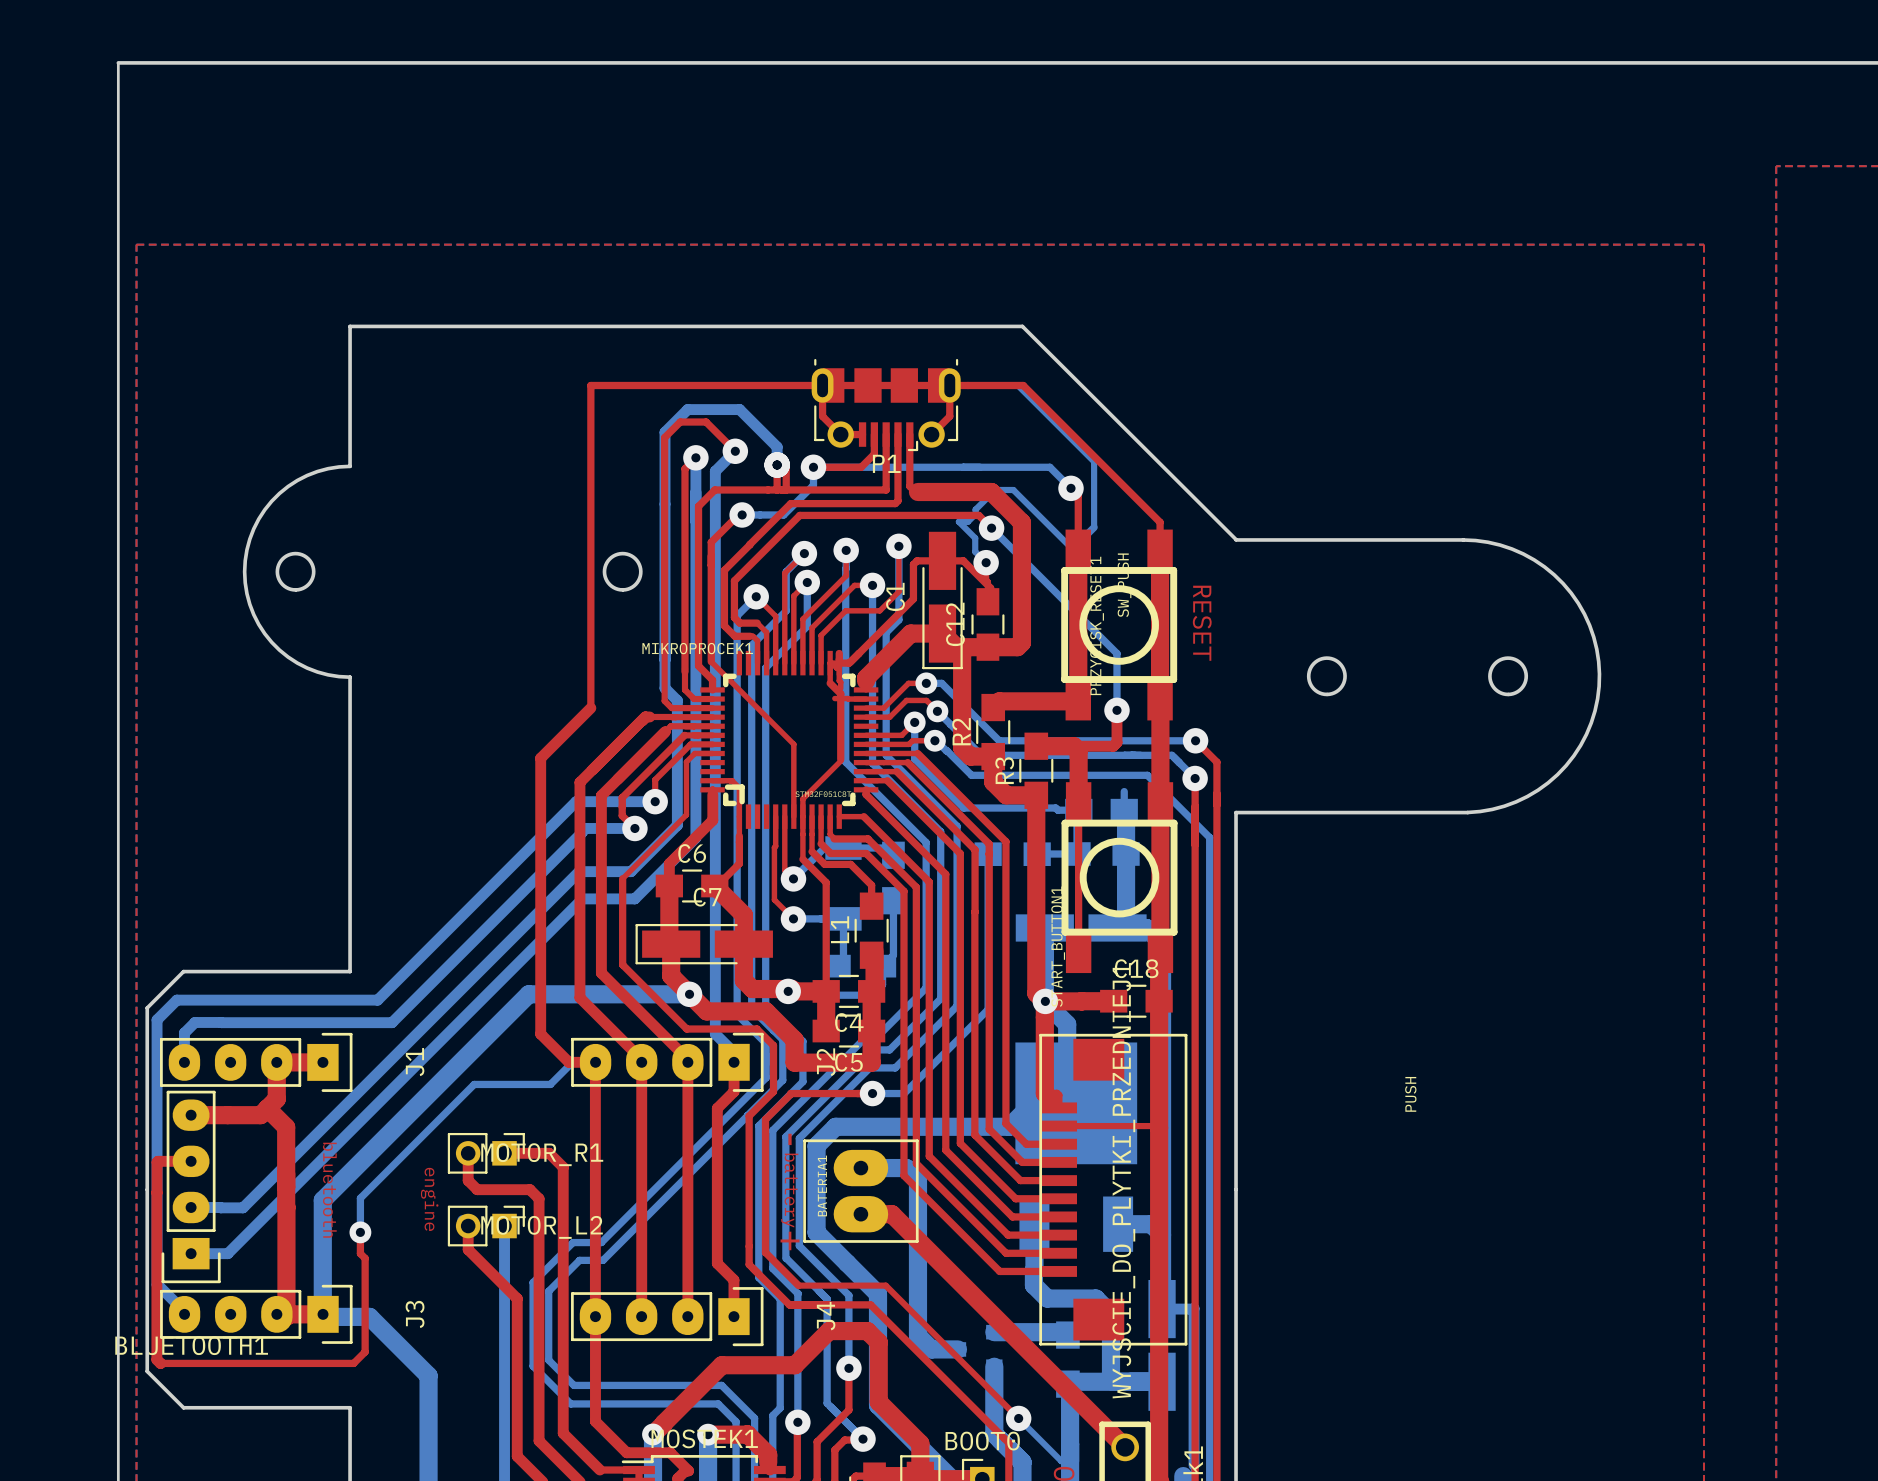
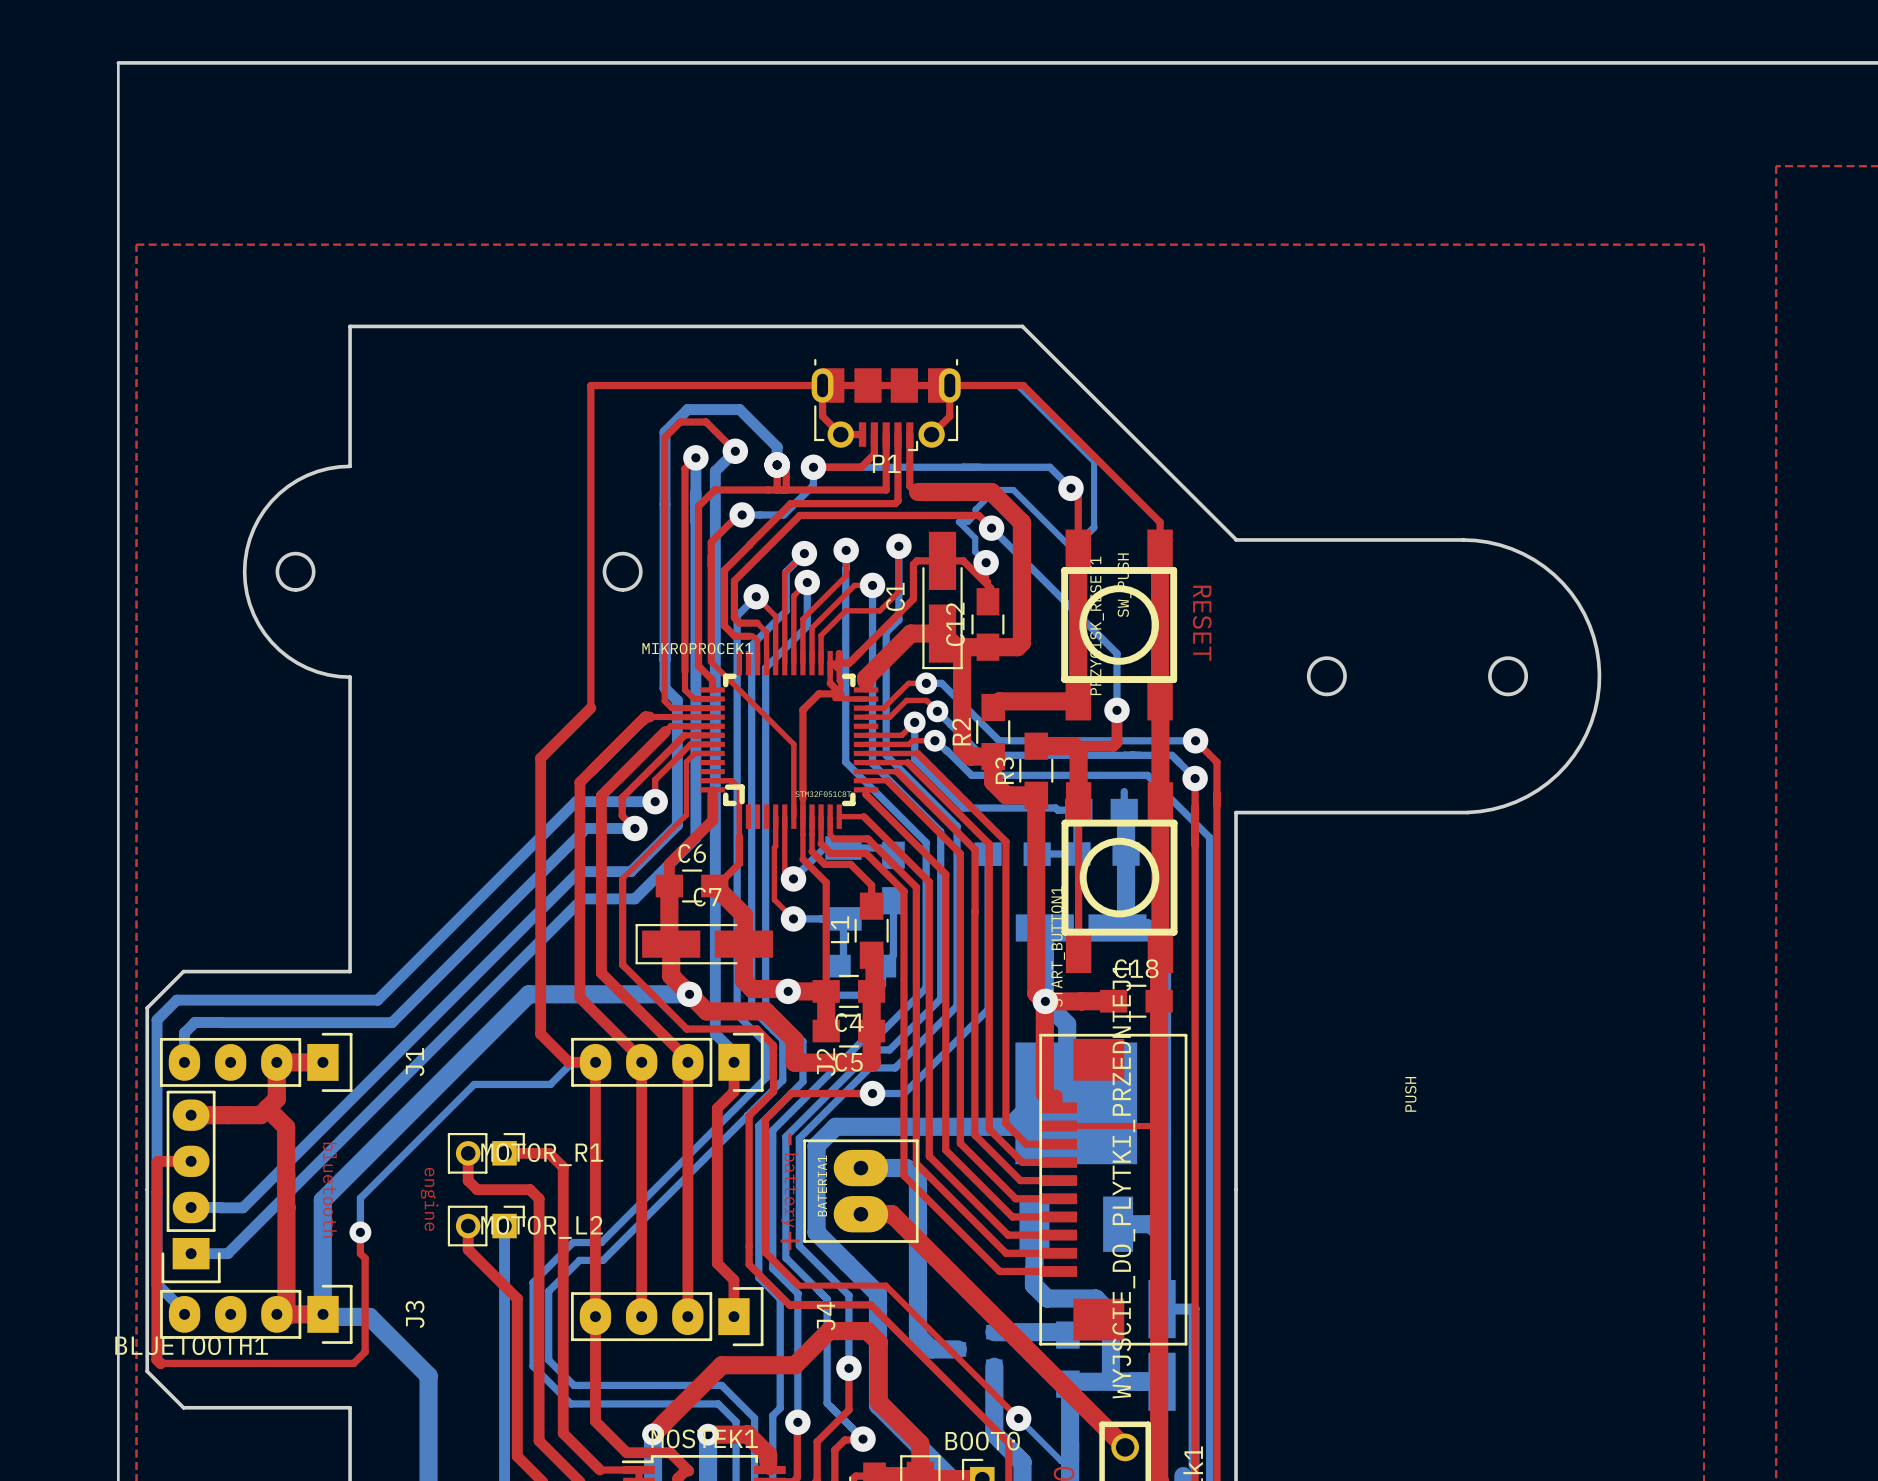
top track: (840, 693) (840, 761) (802, 798) -> (840, 693) (818, 693) (802, 709) (802, 798)

